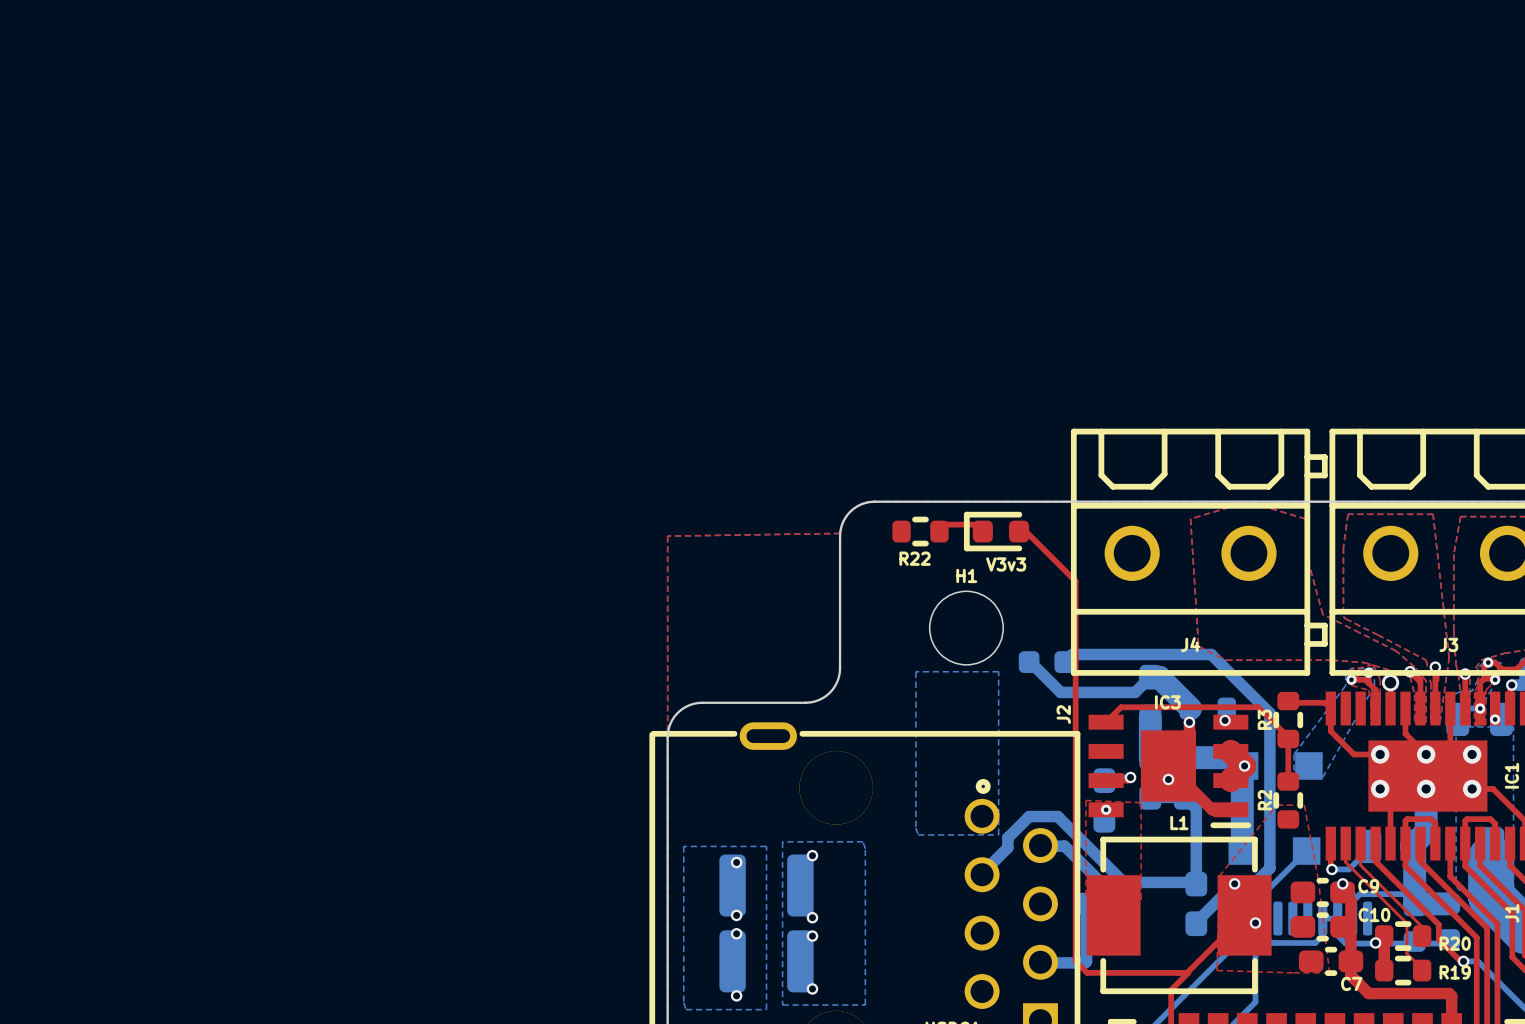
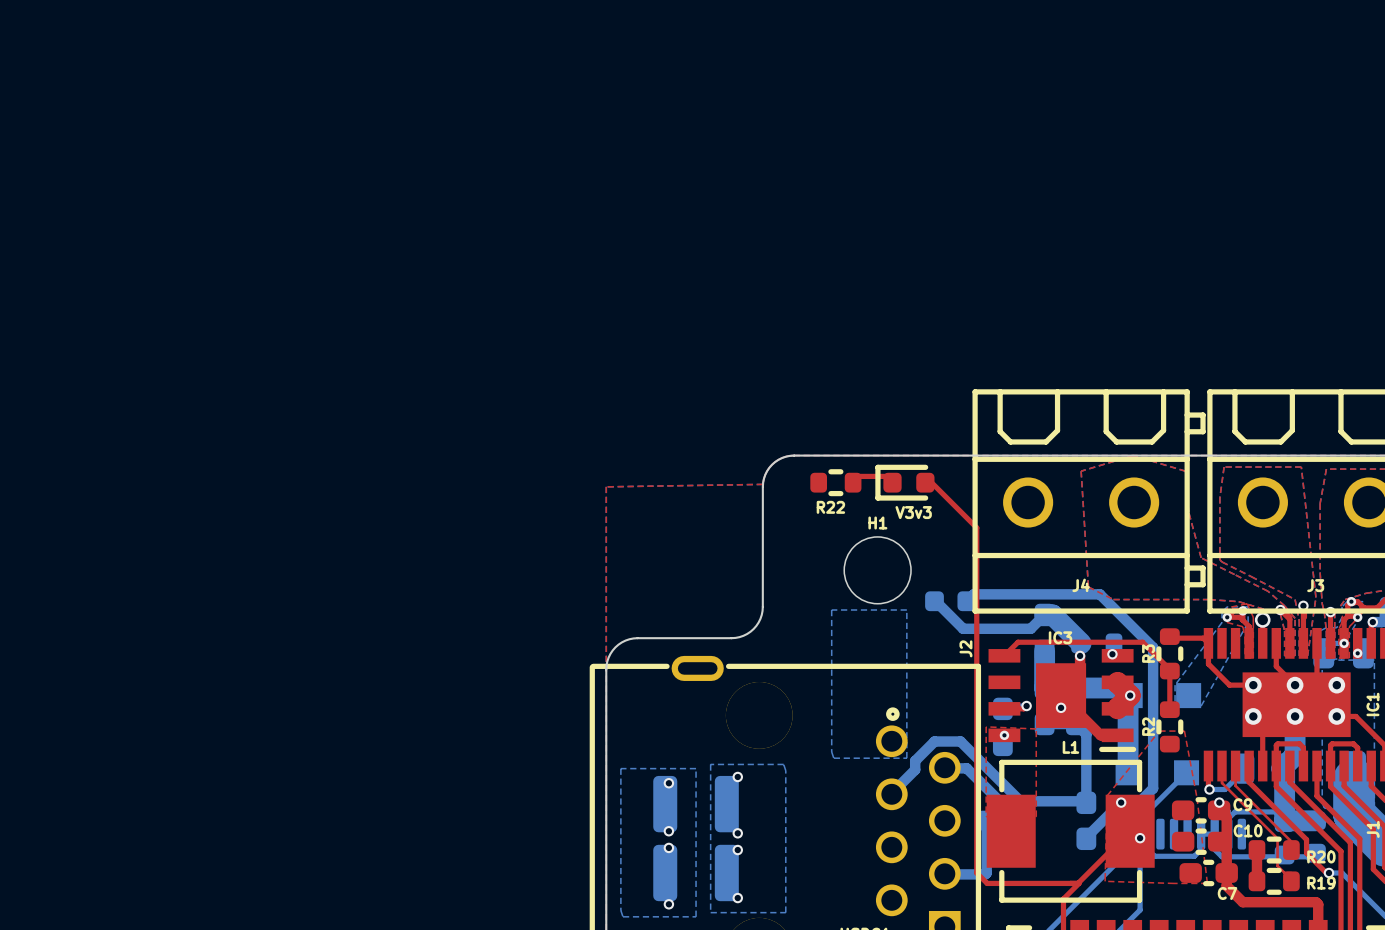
via: (1375, 942) -> none

